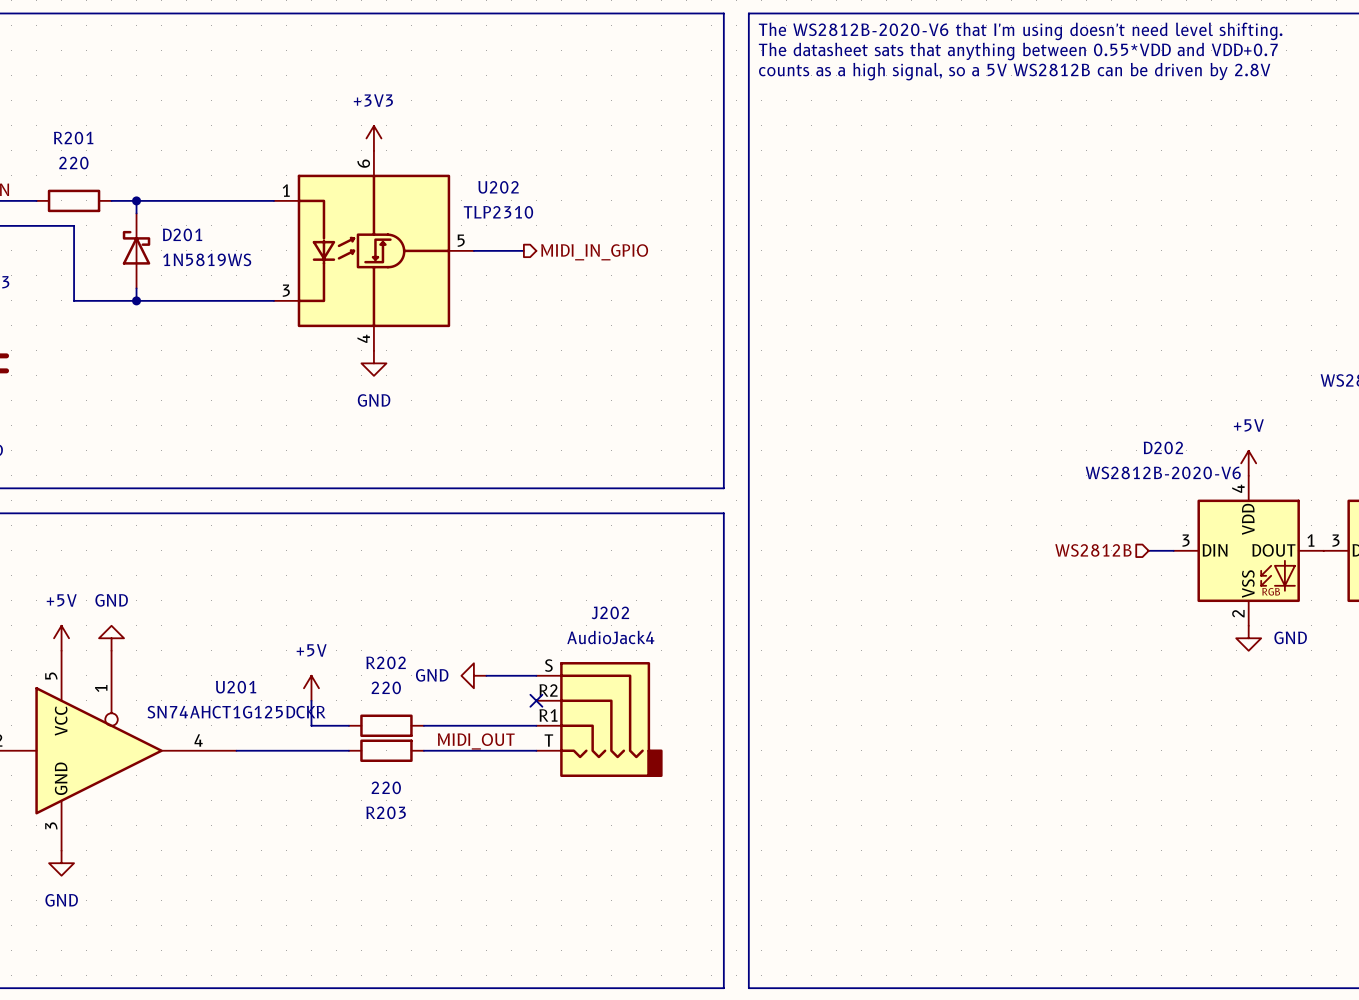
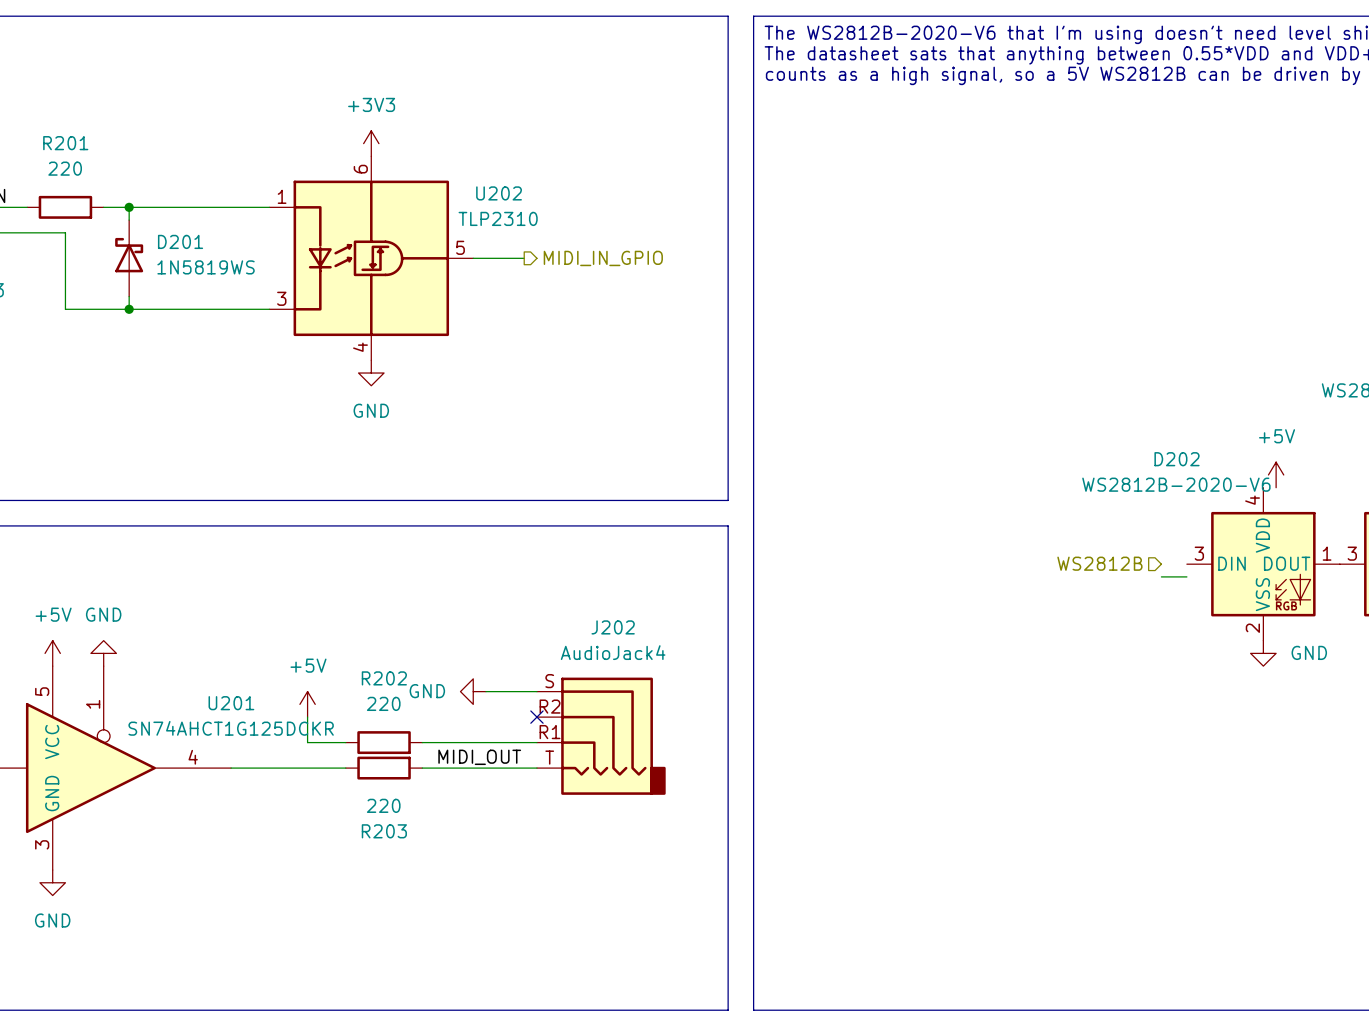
power symbol position: +5V (1248, 463) -> +5V (1276, 474)
wire: (1148, 550) (1173, 550) -> (1161, 576) (1186, 576)

